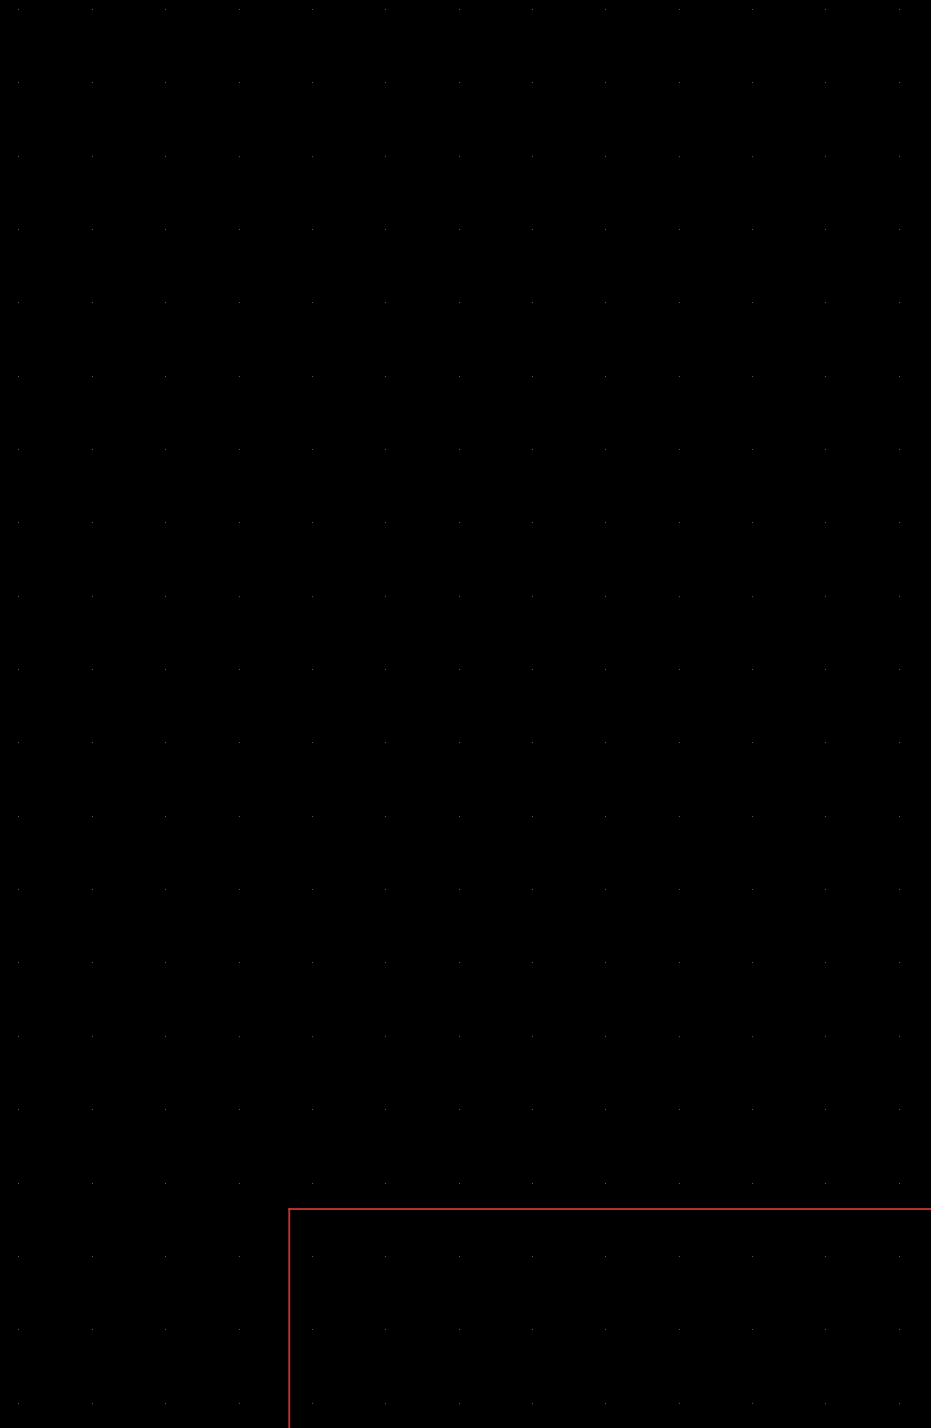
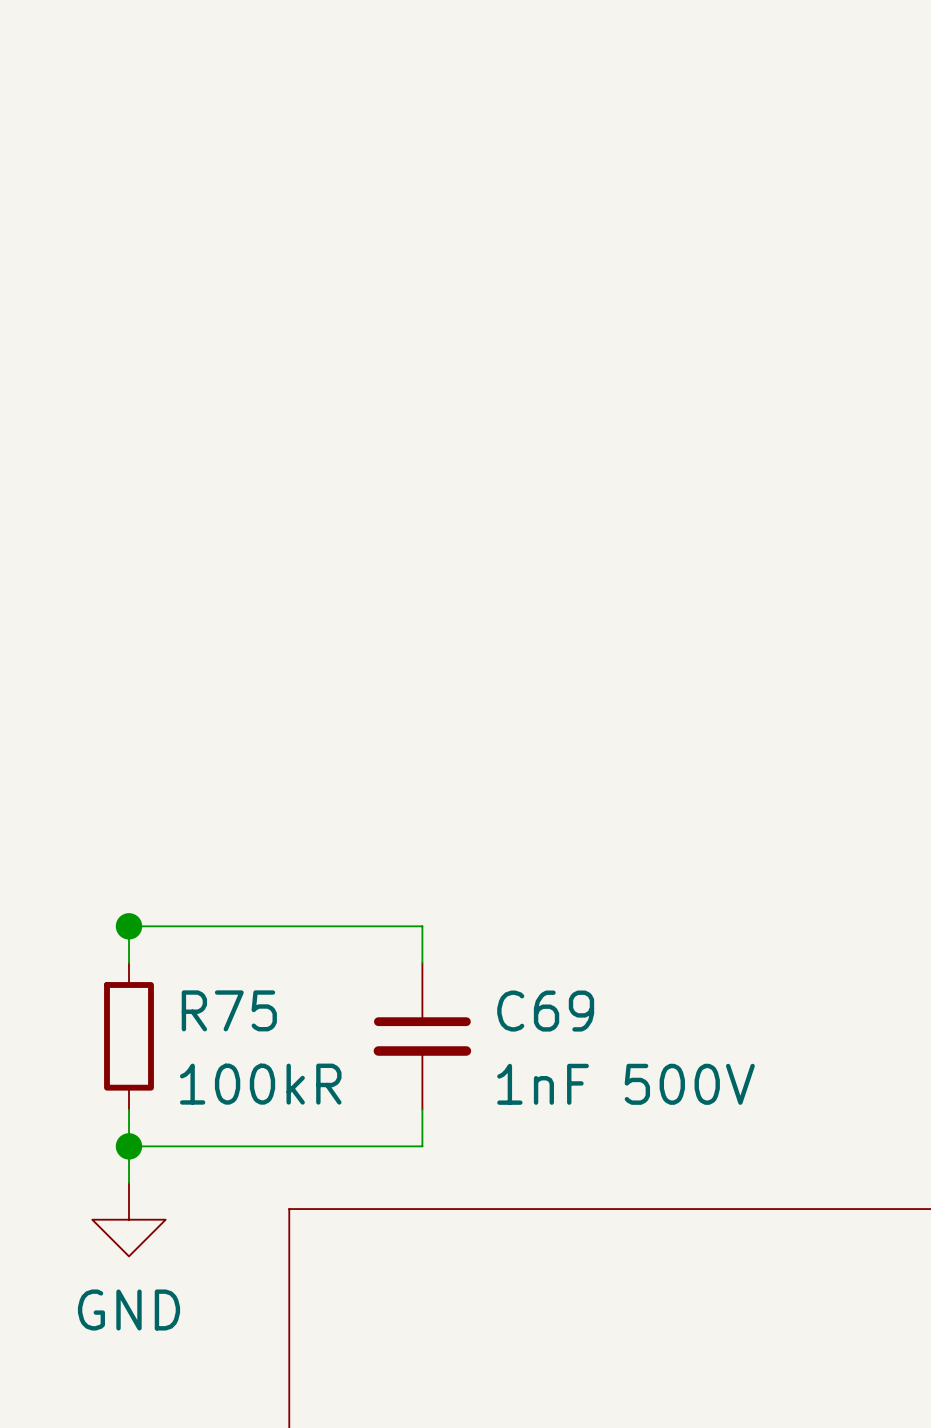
junction: none -> (129, 926)
wire: none -> (129, 962) (129, 926) (422, 926) (422, 962)
R75: none -> 100kR (129, 1036)
C69: none -> 1nF 500V (422, 1036)
wire: none -> (129, 1109) (129, 1183)
wire: none -> (422, 1109) (422, 1146) (129, 1146)
junction: none -> (129, 1146)
power symbol: none -> GND (129, 1219)

